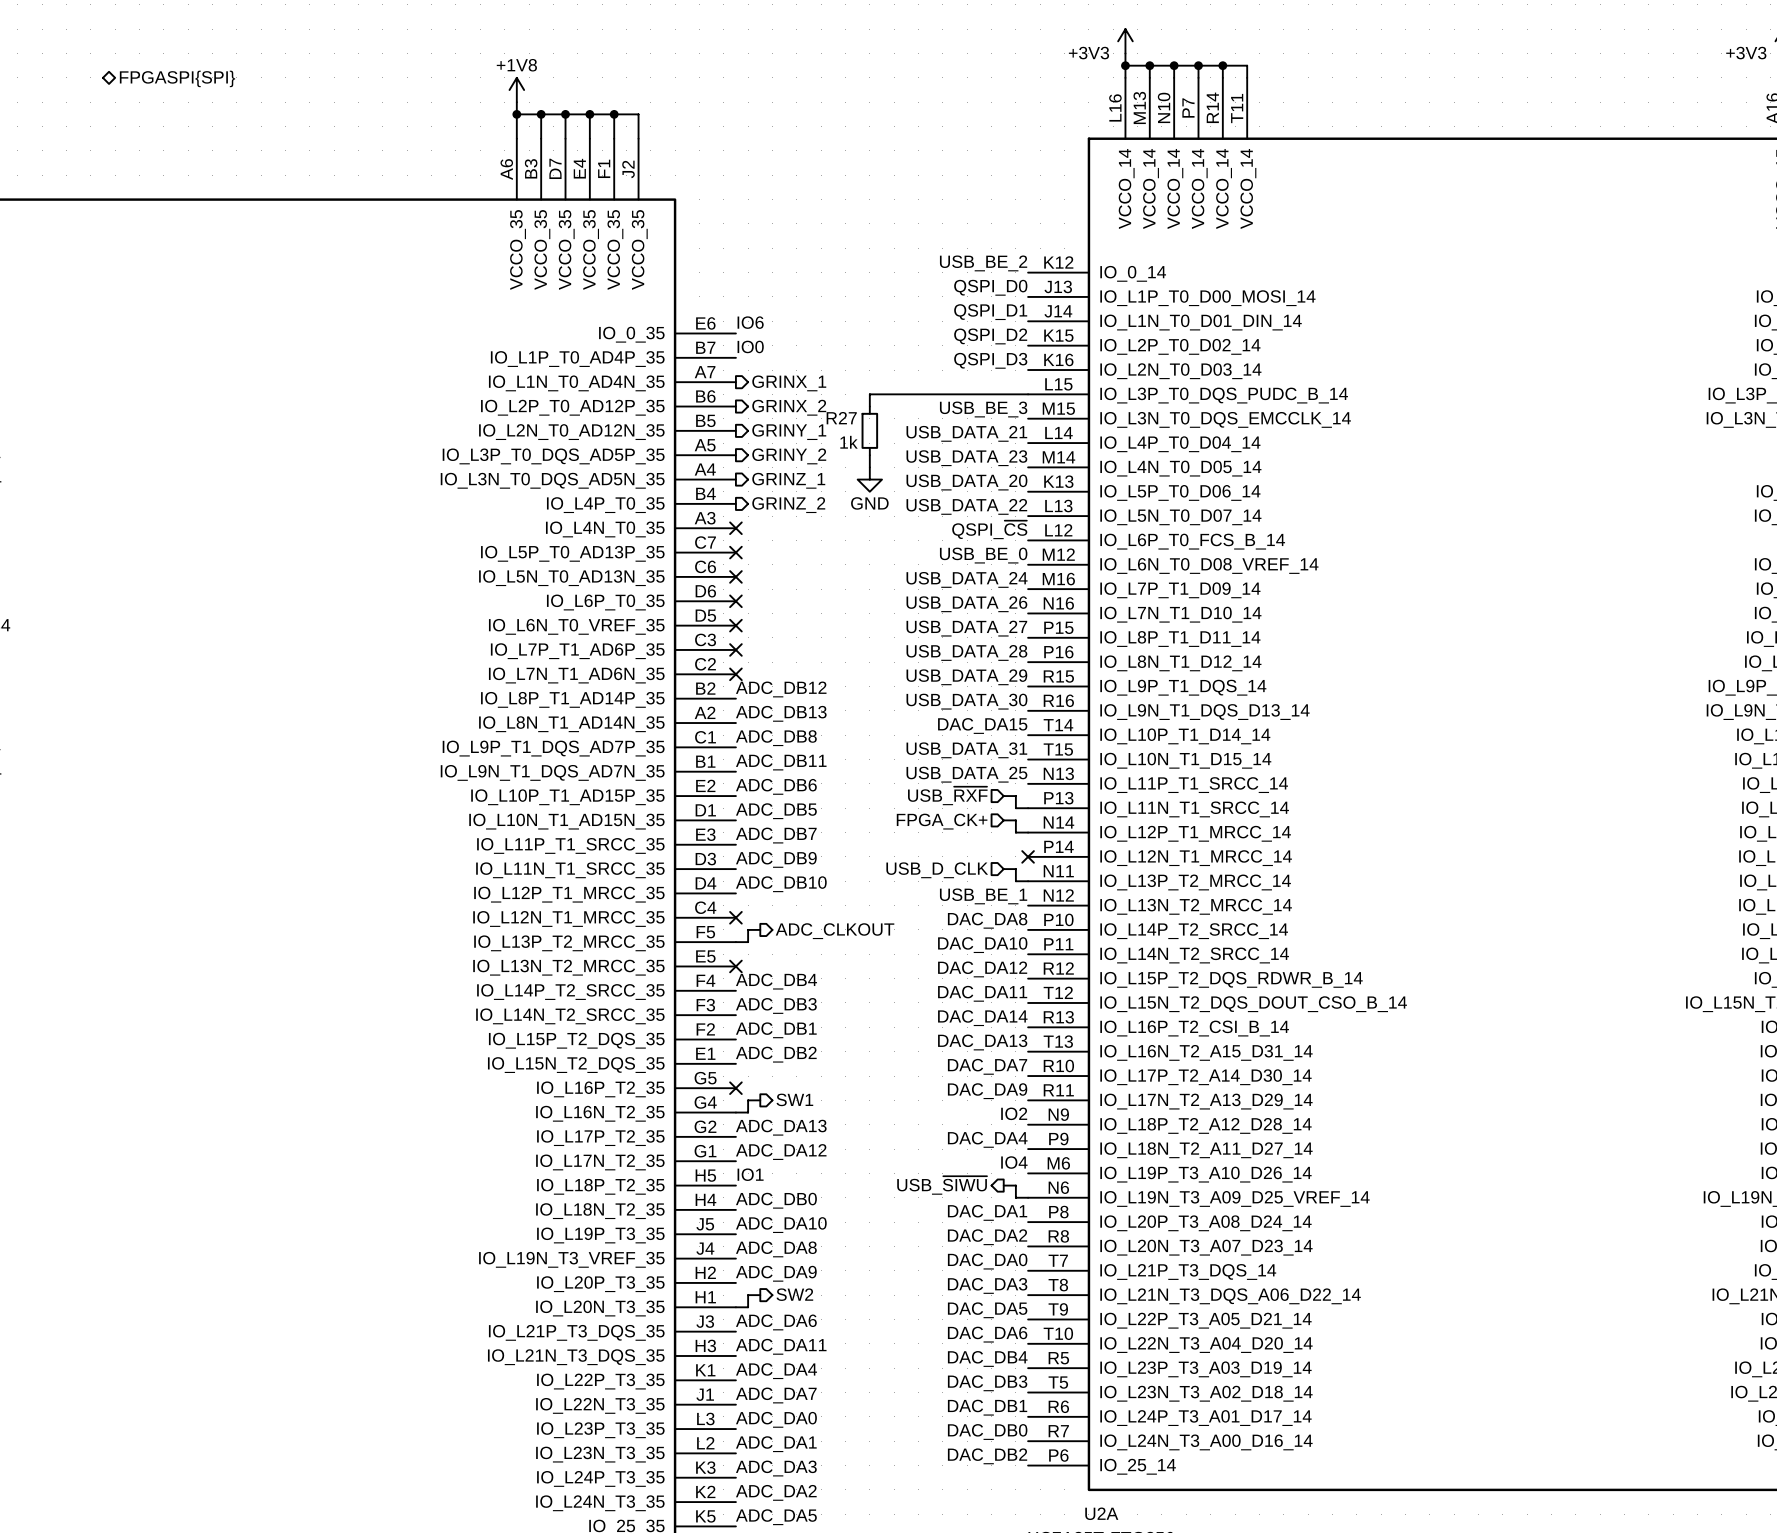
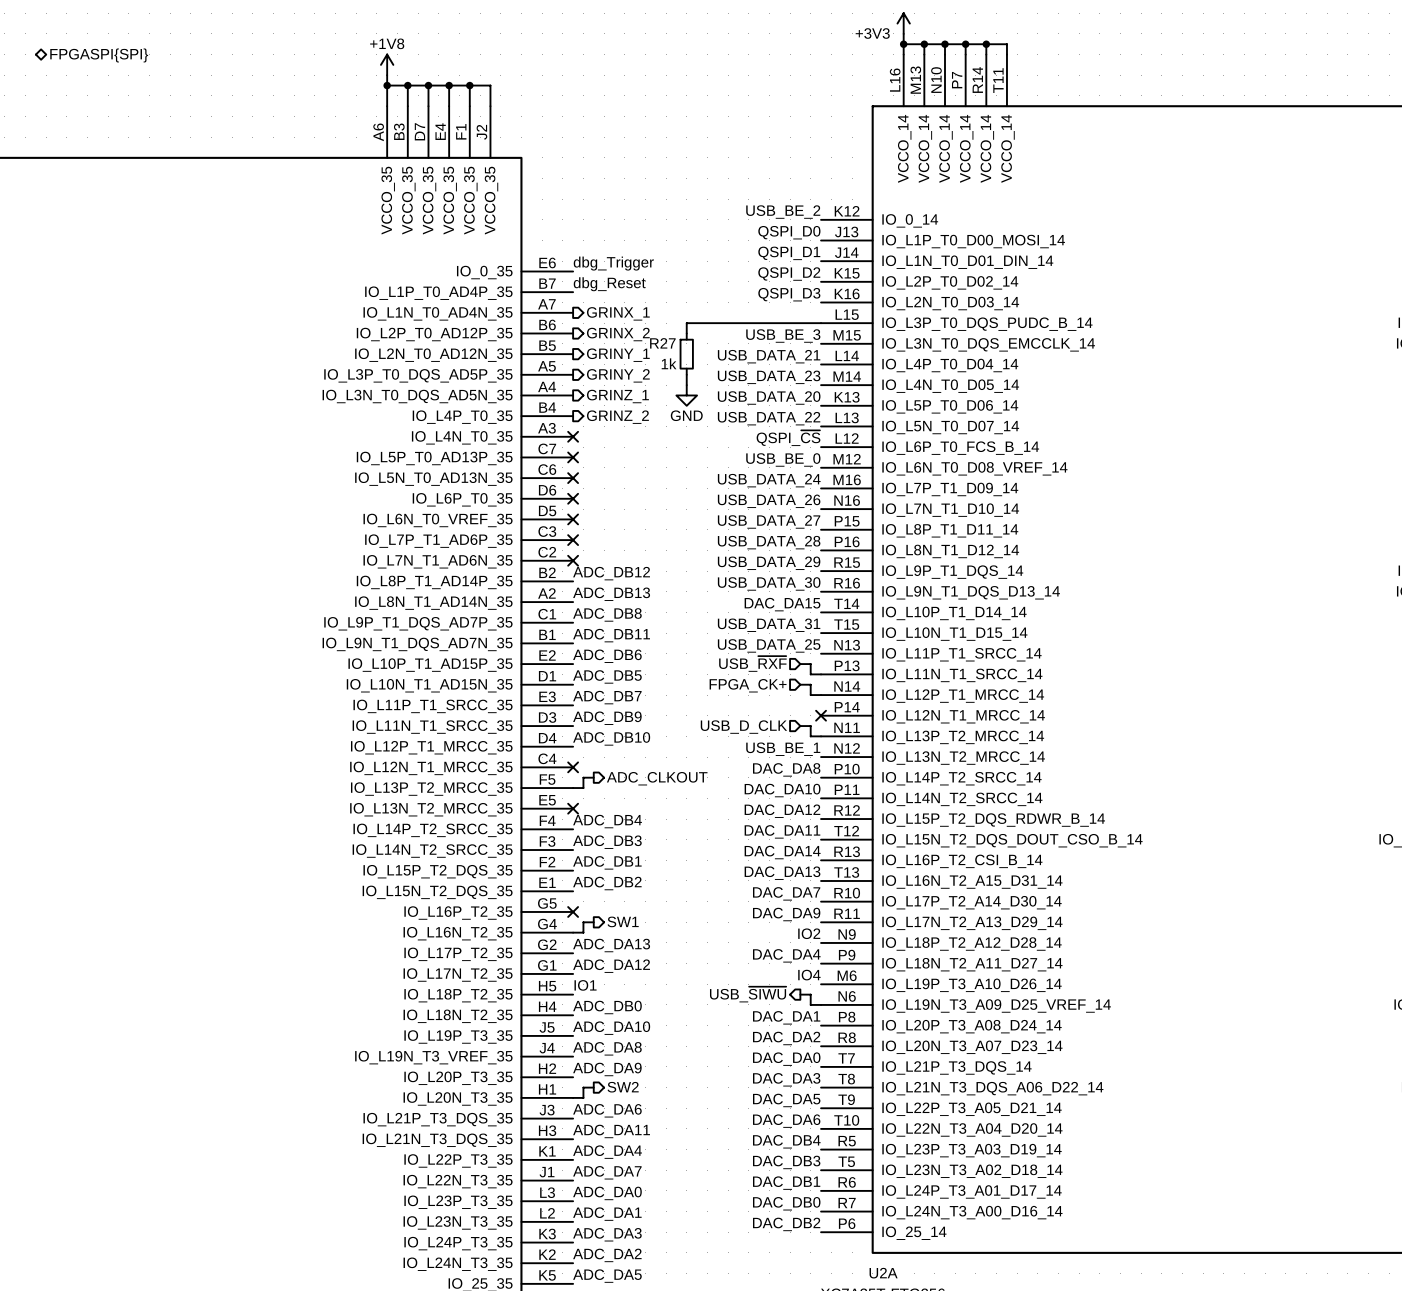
label: IO6 (750, 322) -> dbg_Trigger (613, 263)
label: IO0 (750, 346) -> dbg_Reset (609, 284)

